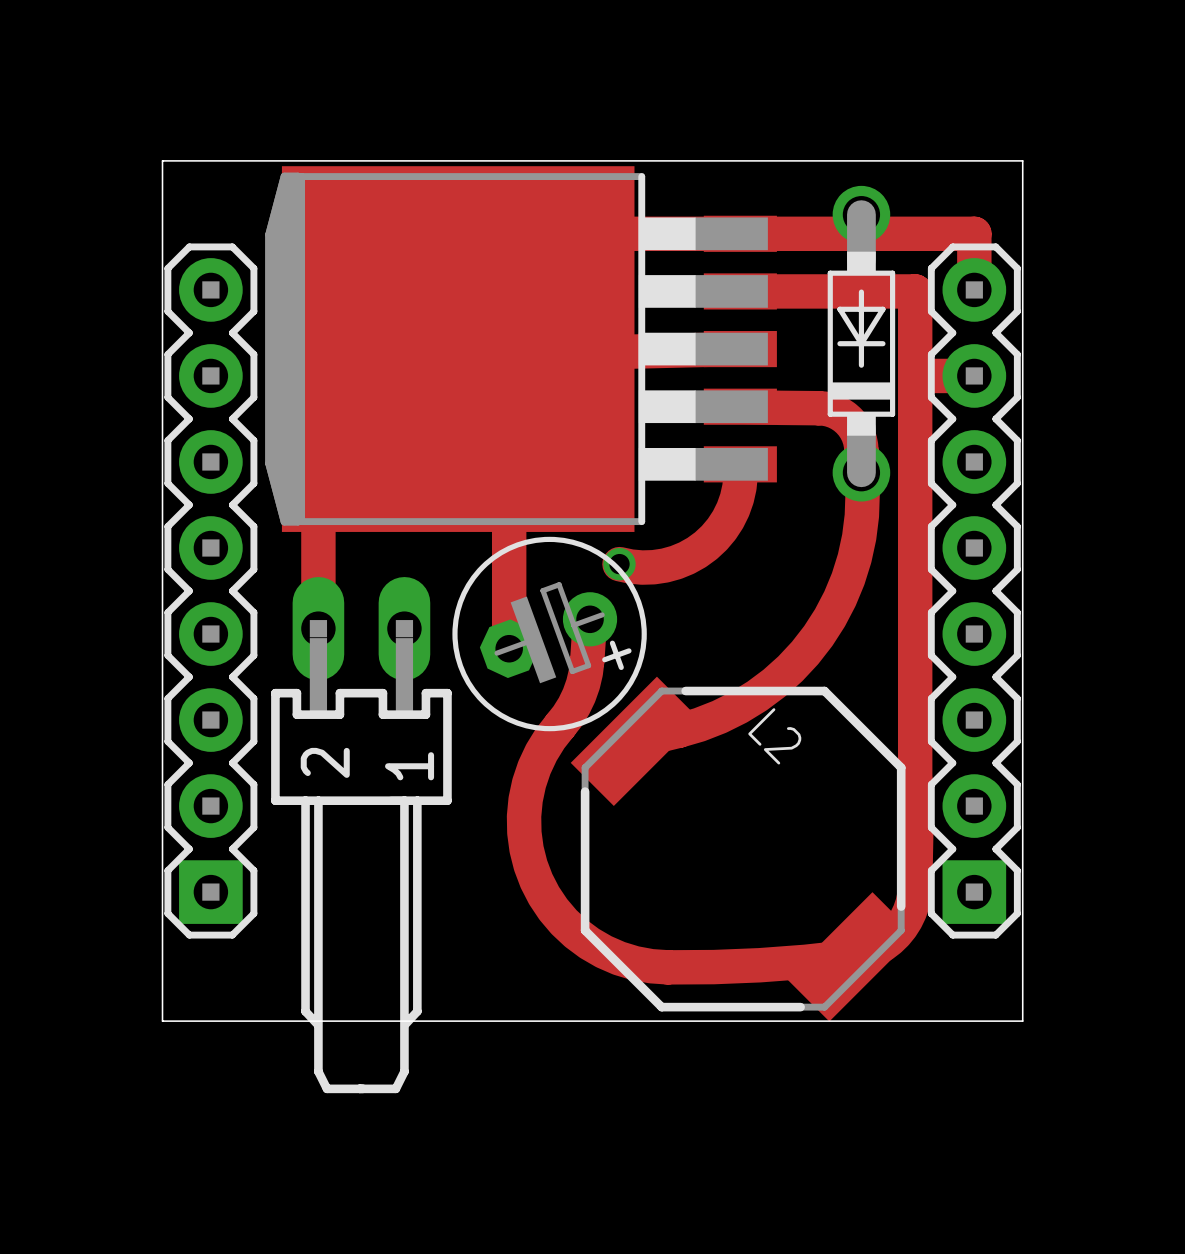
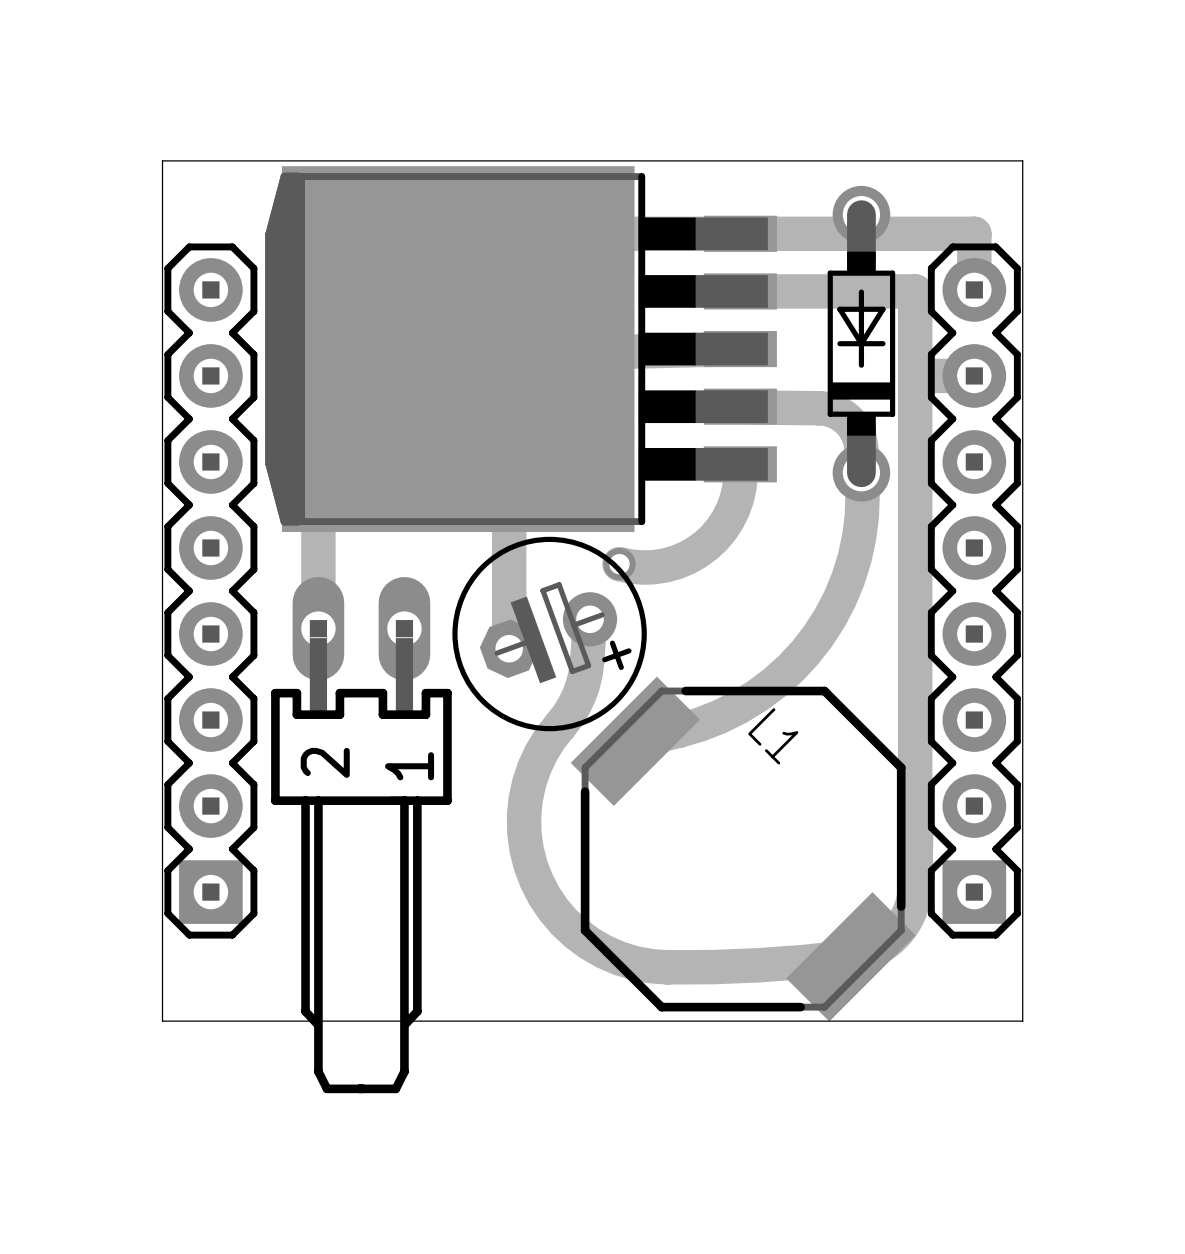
L2 name: L2 (774, 736) -> L1 (773, 736)

